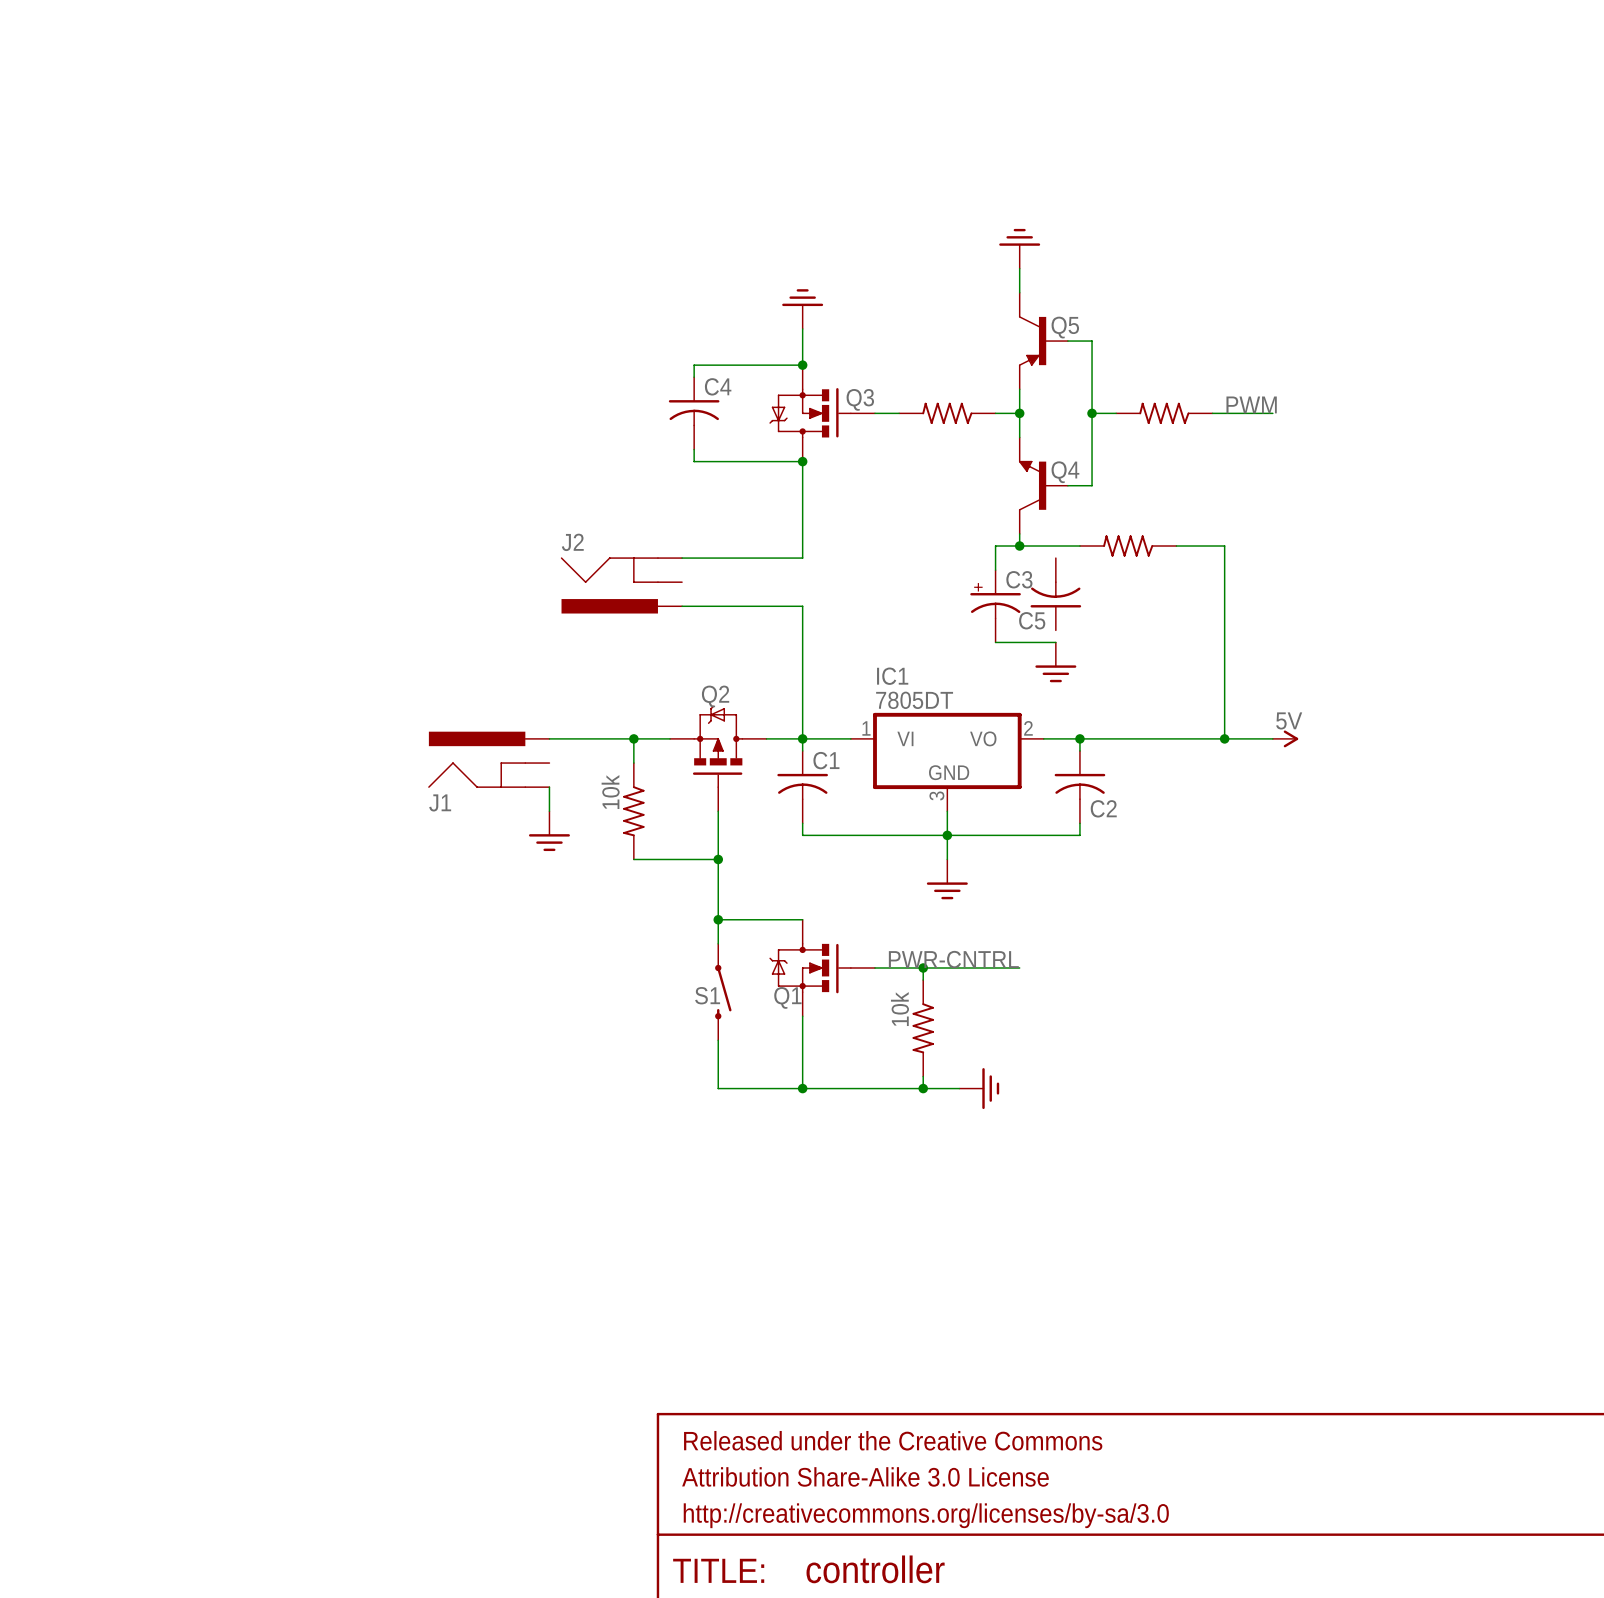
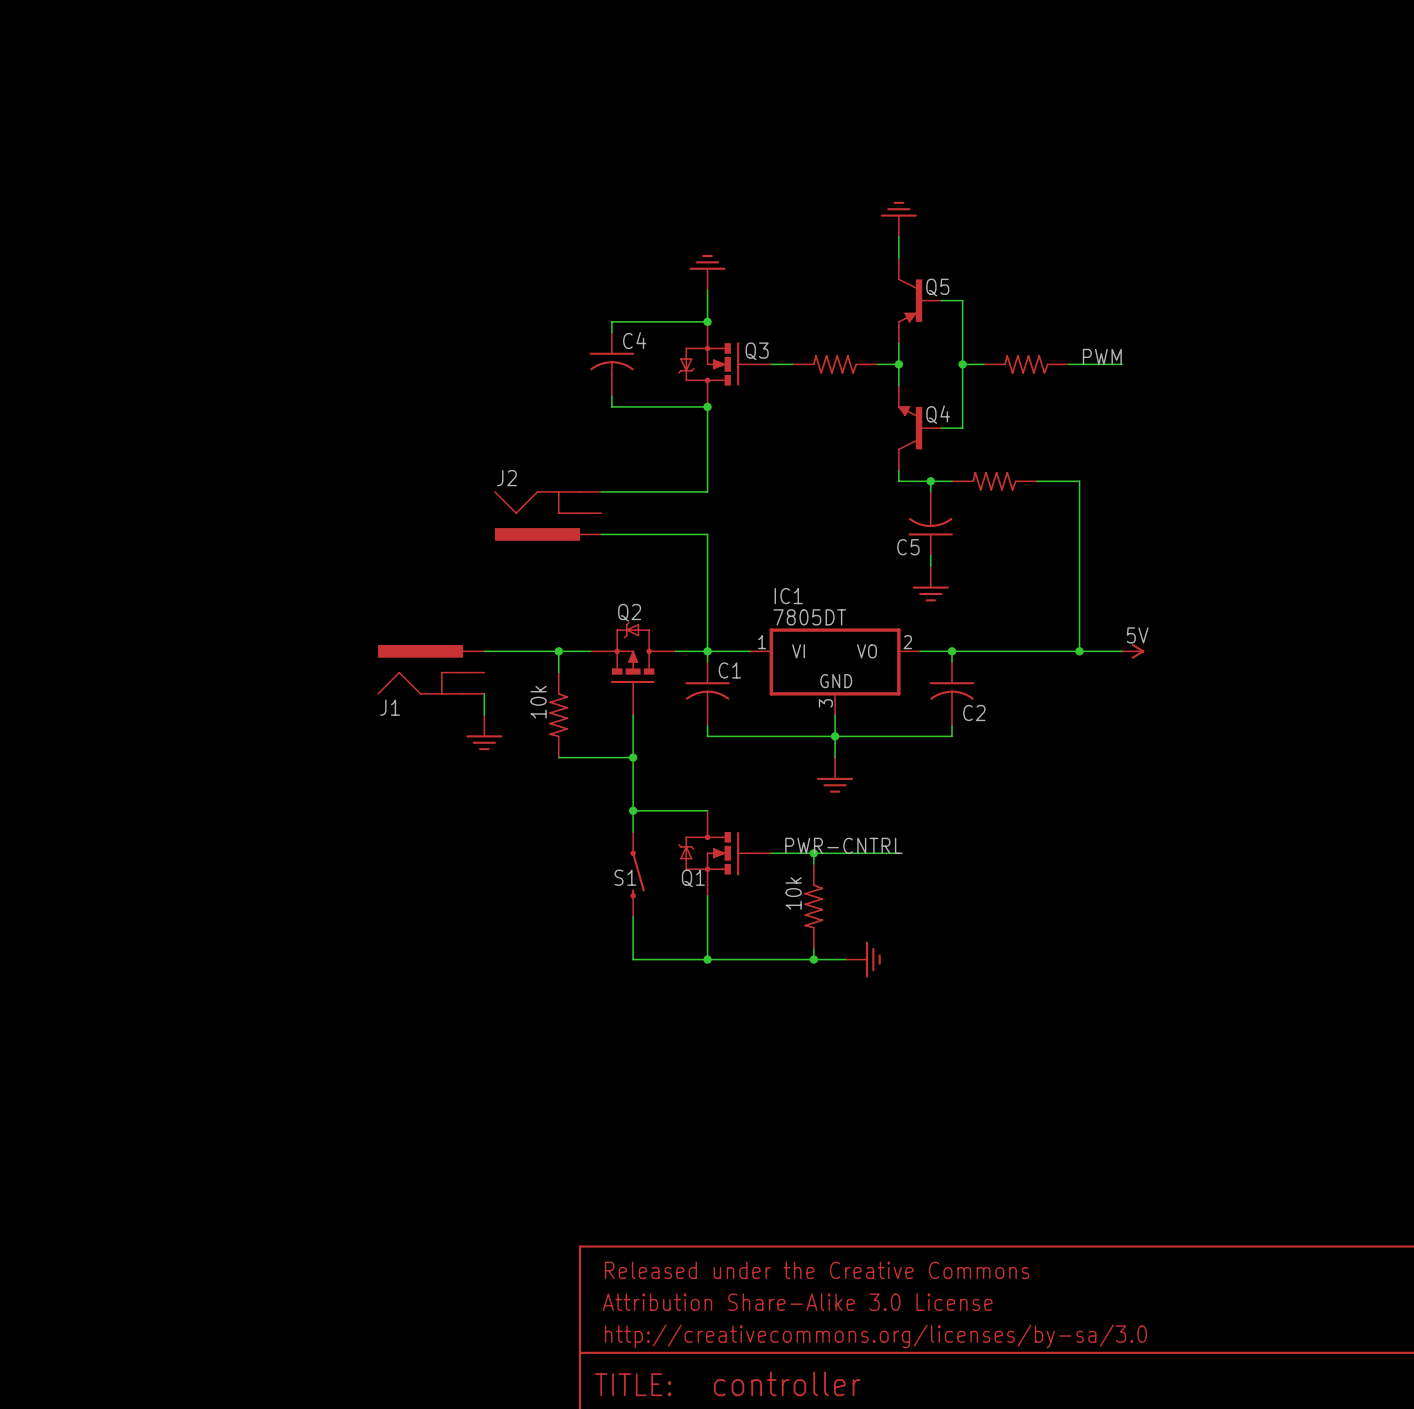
wire: (1019, 546) (995, 546) (995, 570) -> none
junction position: (1019, 546) -> (930, 481)
wire: none -> (930, 481) (930, 491)
C3: (995, 606) -> none
wire: (995, 642) (1055, 642) -> (930, 555) (930, 566)

